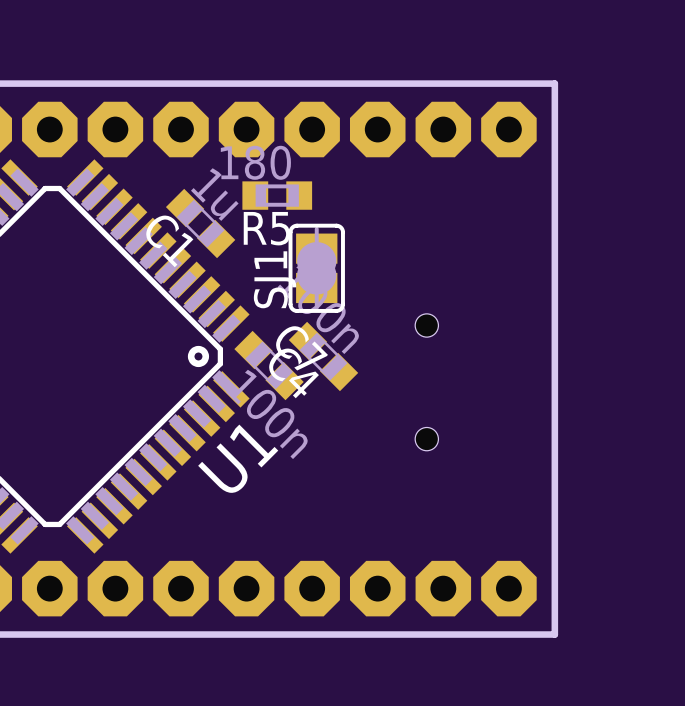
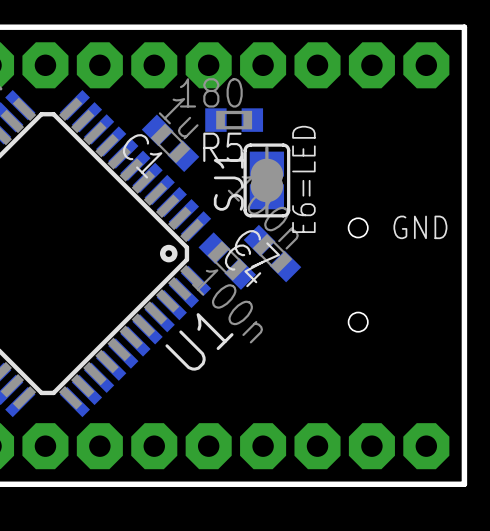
text: none -> E6=LED (303, 179)
text: none -> GND (420, 227)

